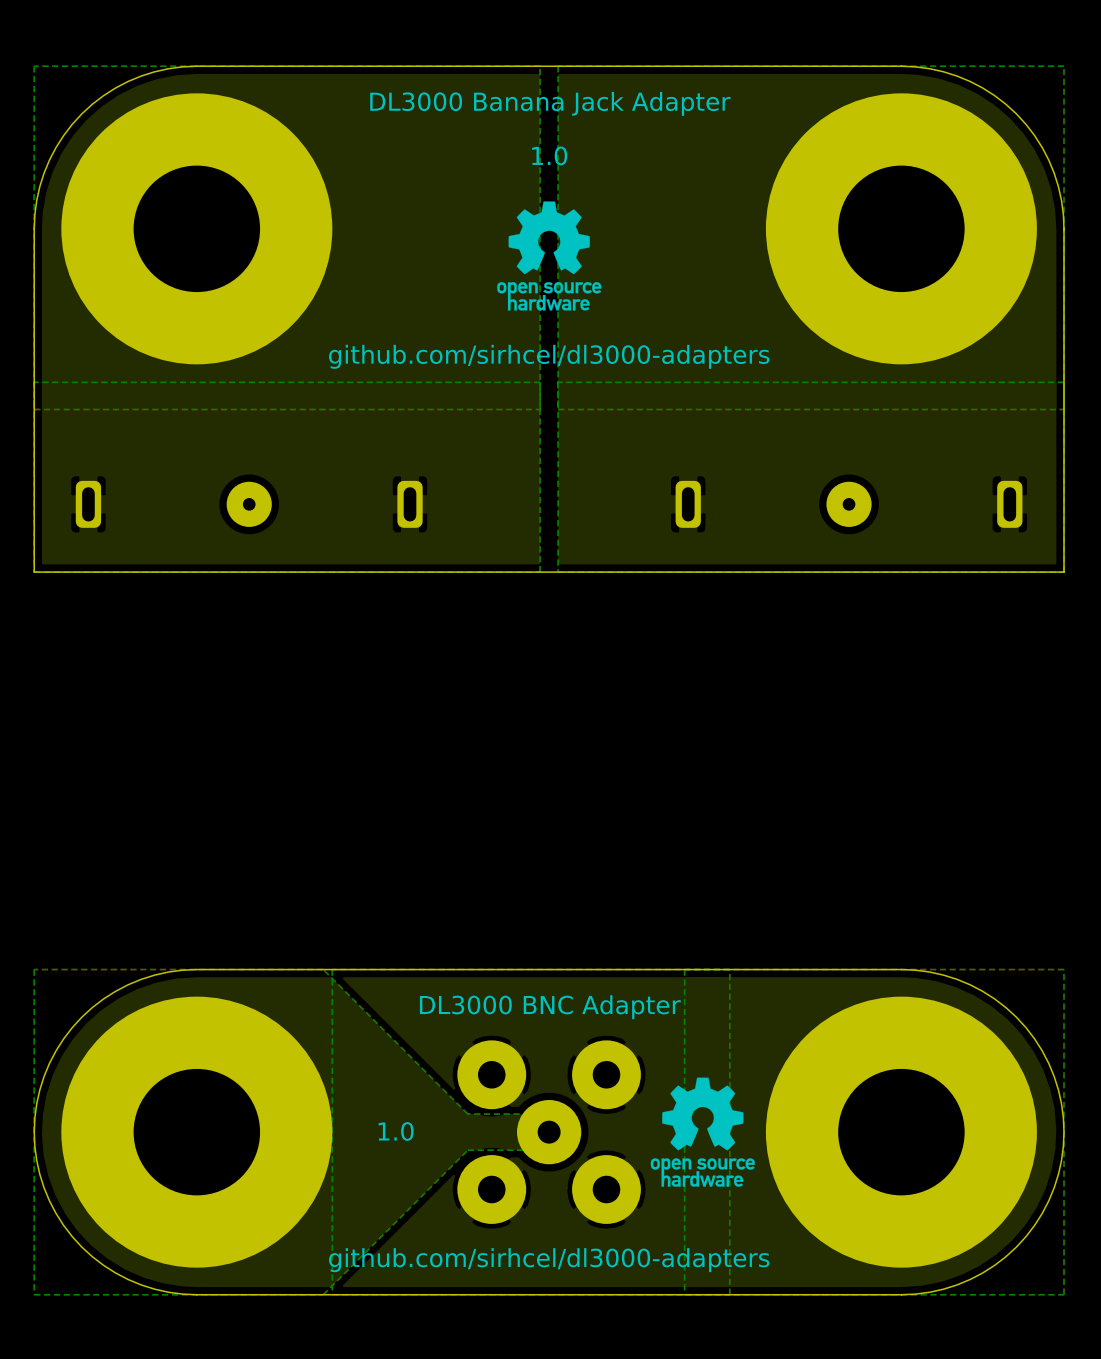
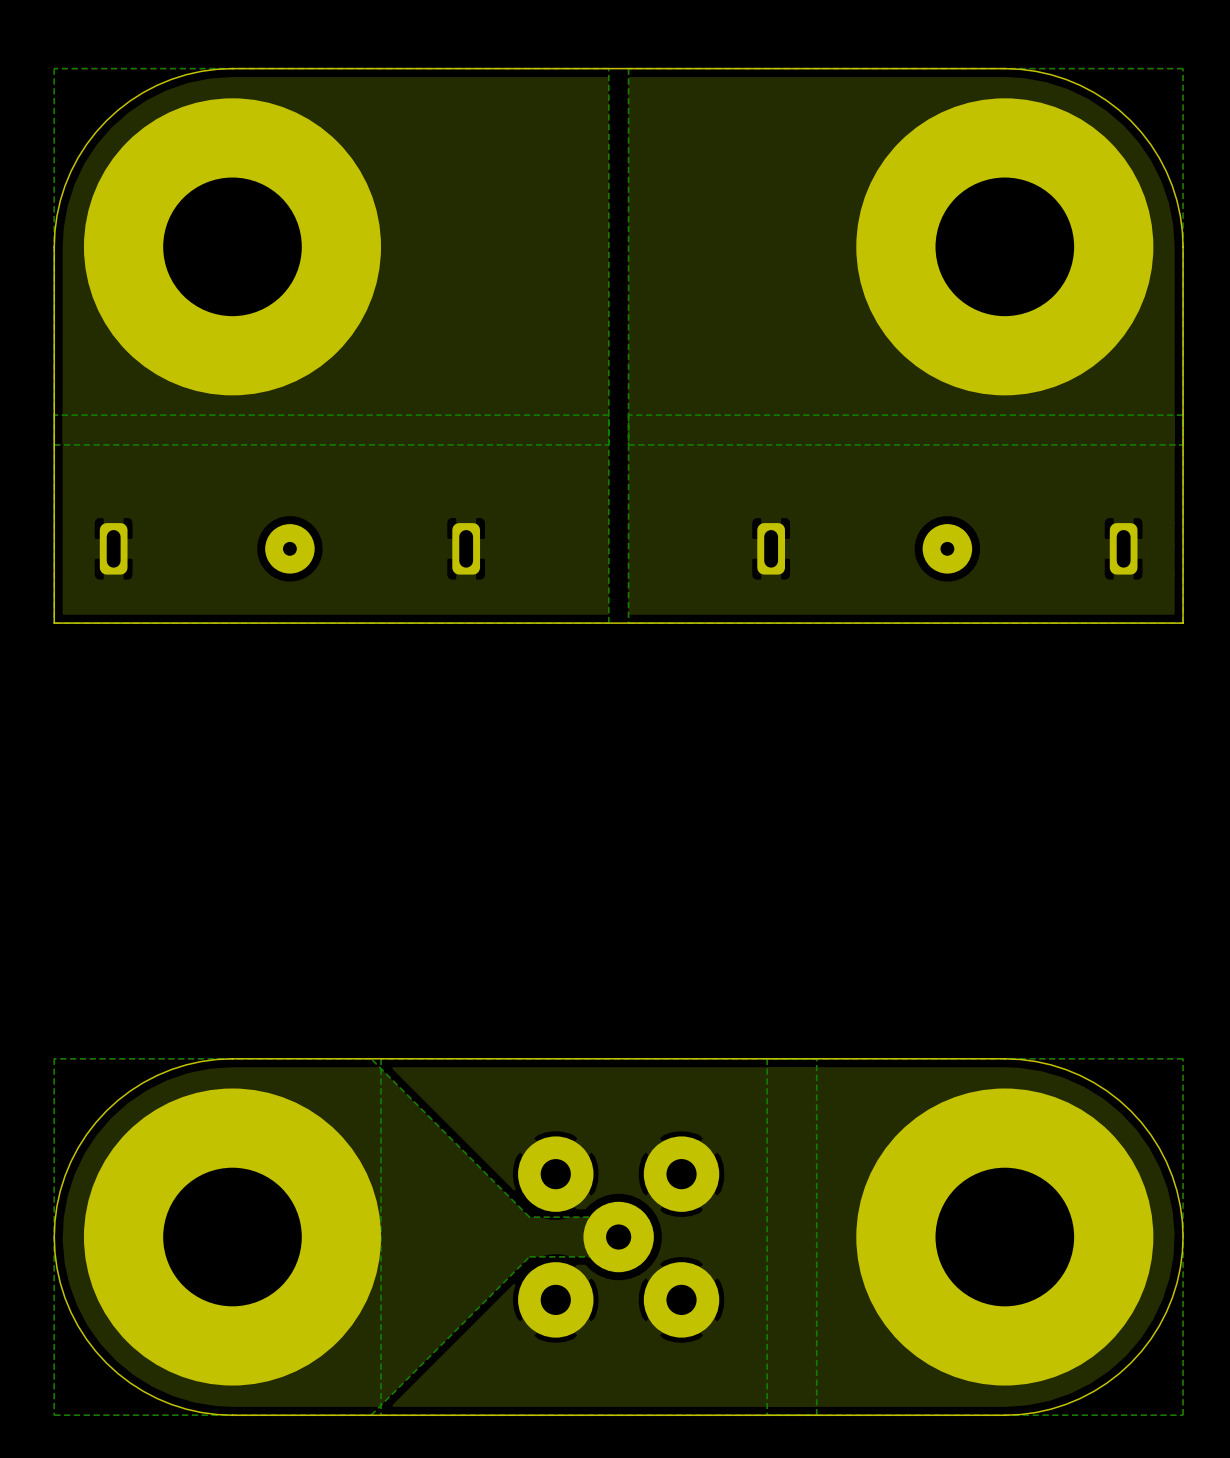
text: DL3000 Banana Jack Adapter (550, 103) -> none
text: 1.0 (549, 155) -> none
drawing: [497, 201, 602, 311] -> none
text: github.com/sirhcel/dl3000-adapters (549, 356) -> none
text: DL3000 BNC Adapter (550, 1007) -> none
drawing: [650, 1077, 755, 1187] -> none
text: 1.0 (396, 1131) -> none
text: github.com/sirhcel/dl3000-adapters (549, 1260) -> none

